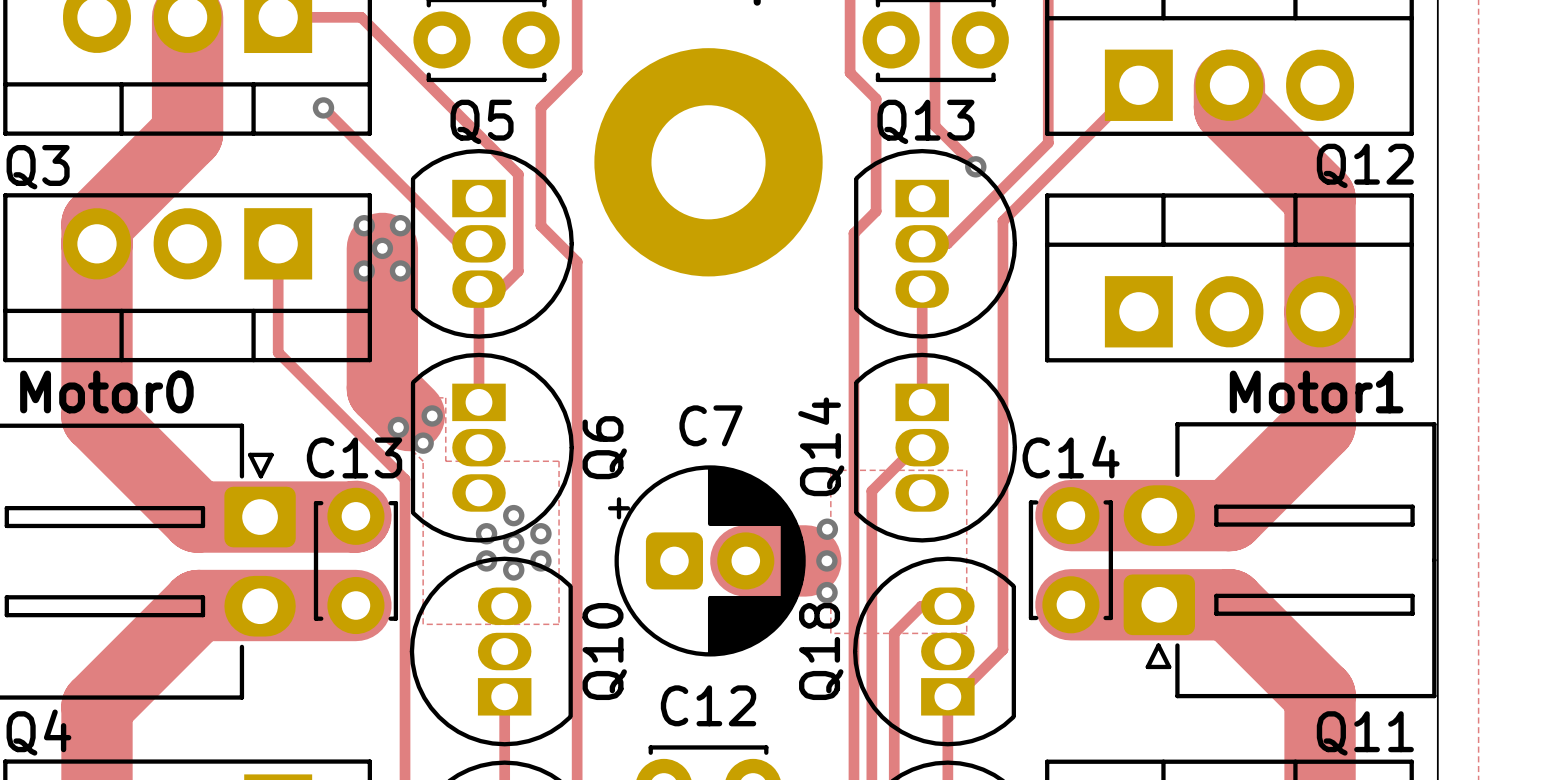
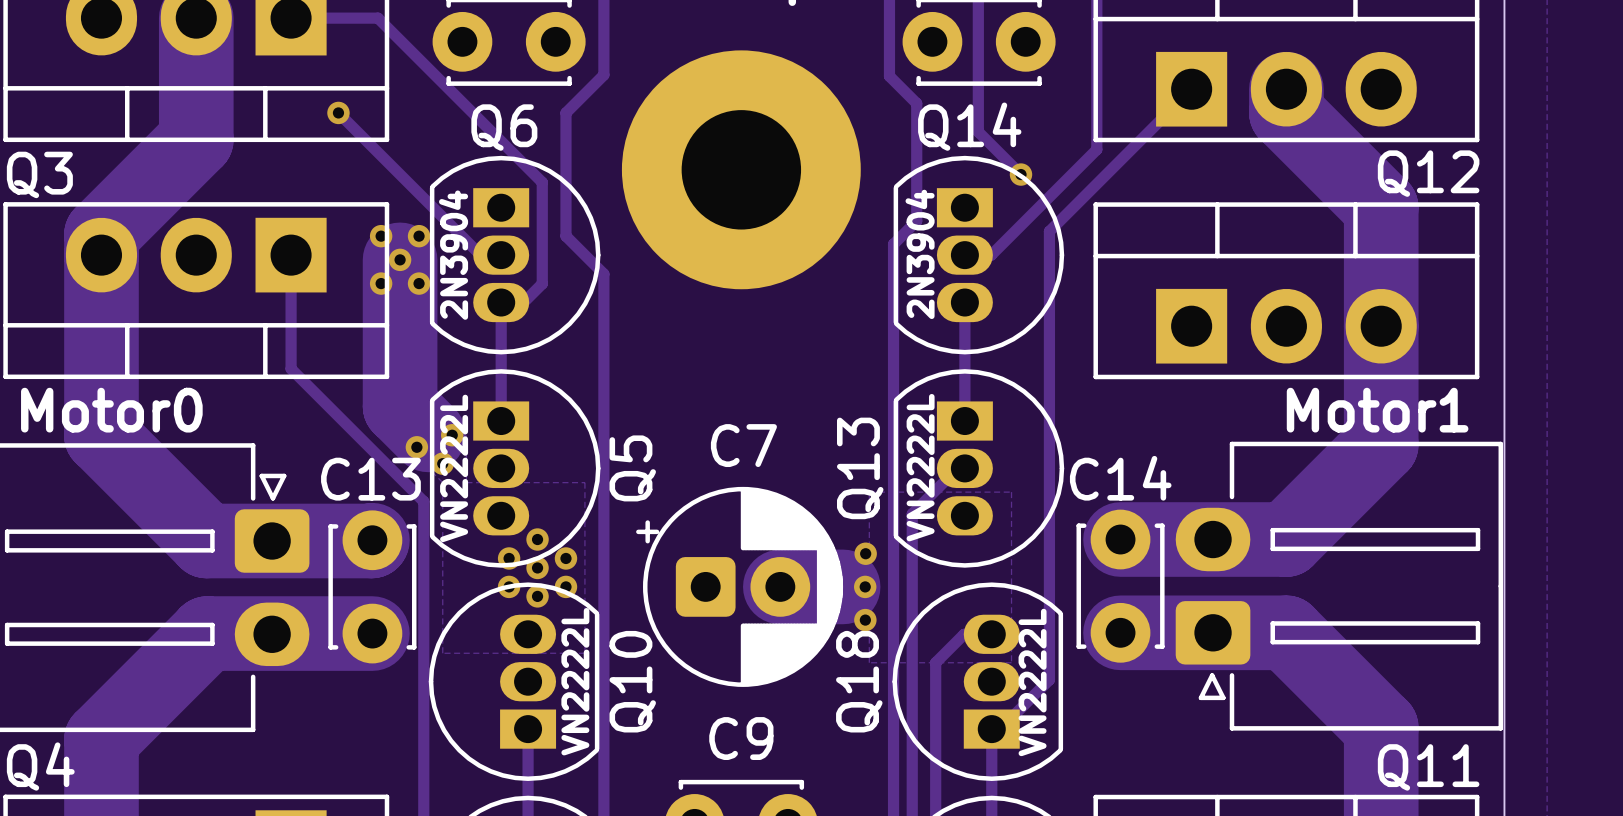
Q5 name: Q5 (482, 121) -> Q6 (504, 127)
Q13 name: Q13 (925, 121) -> Q14 (969, 126)
Q5 value: none -> 2N3904 (453, 255)
Q13 value: none -> 2N3904 (920, 254)
Q14 name: Q14 (821, 446) -> Q13 (860, 468)
Q14 value: none -> VN2222L (920, 467)
Q6 value: none -> VN2222L (454, 468)
Q6 name: Q6 (604, 447) -> Q5 (632, 468)
Q10 value: none -> VN2222L (575, 681)
Q18 value: none -> VN2222L (1032, 682)
C12 name: C12 (708, 705) -> C9 (741, 738)

